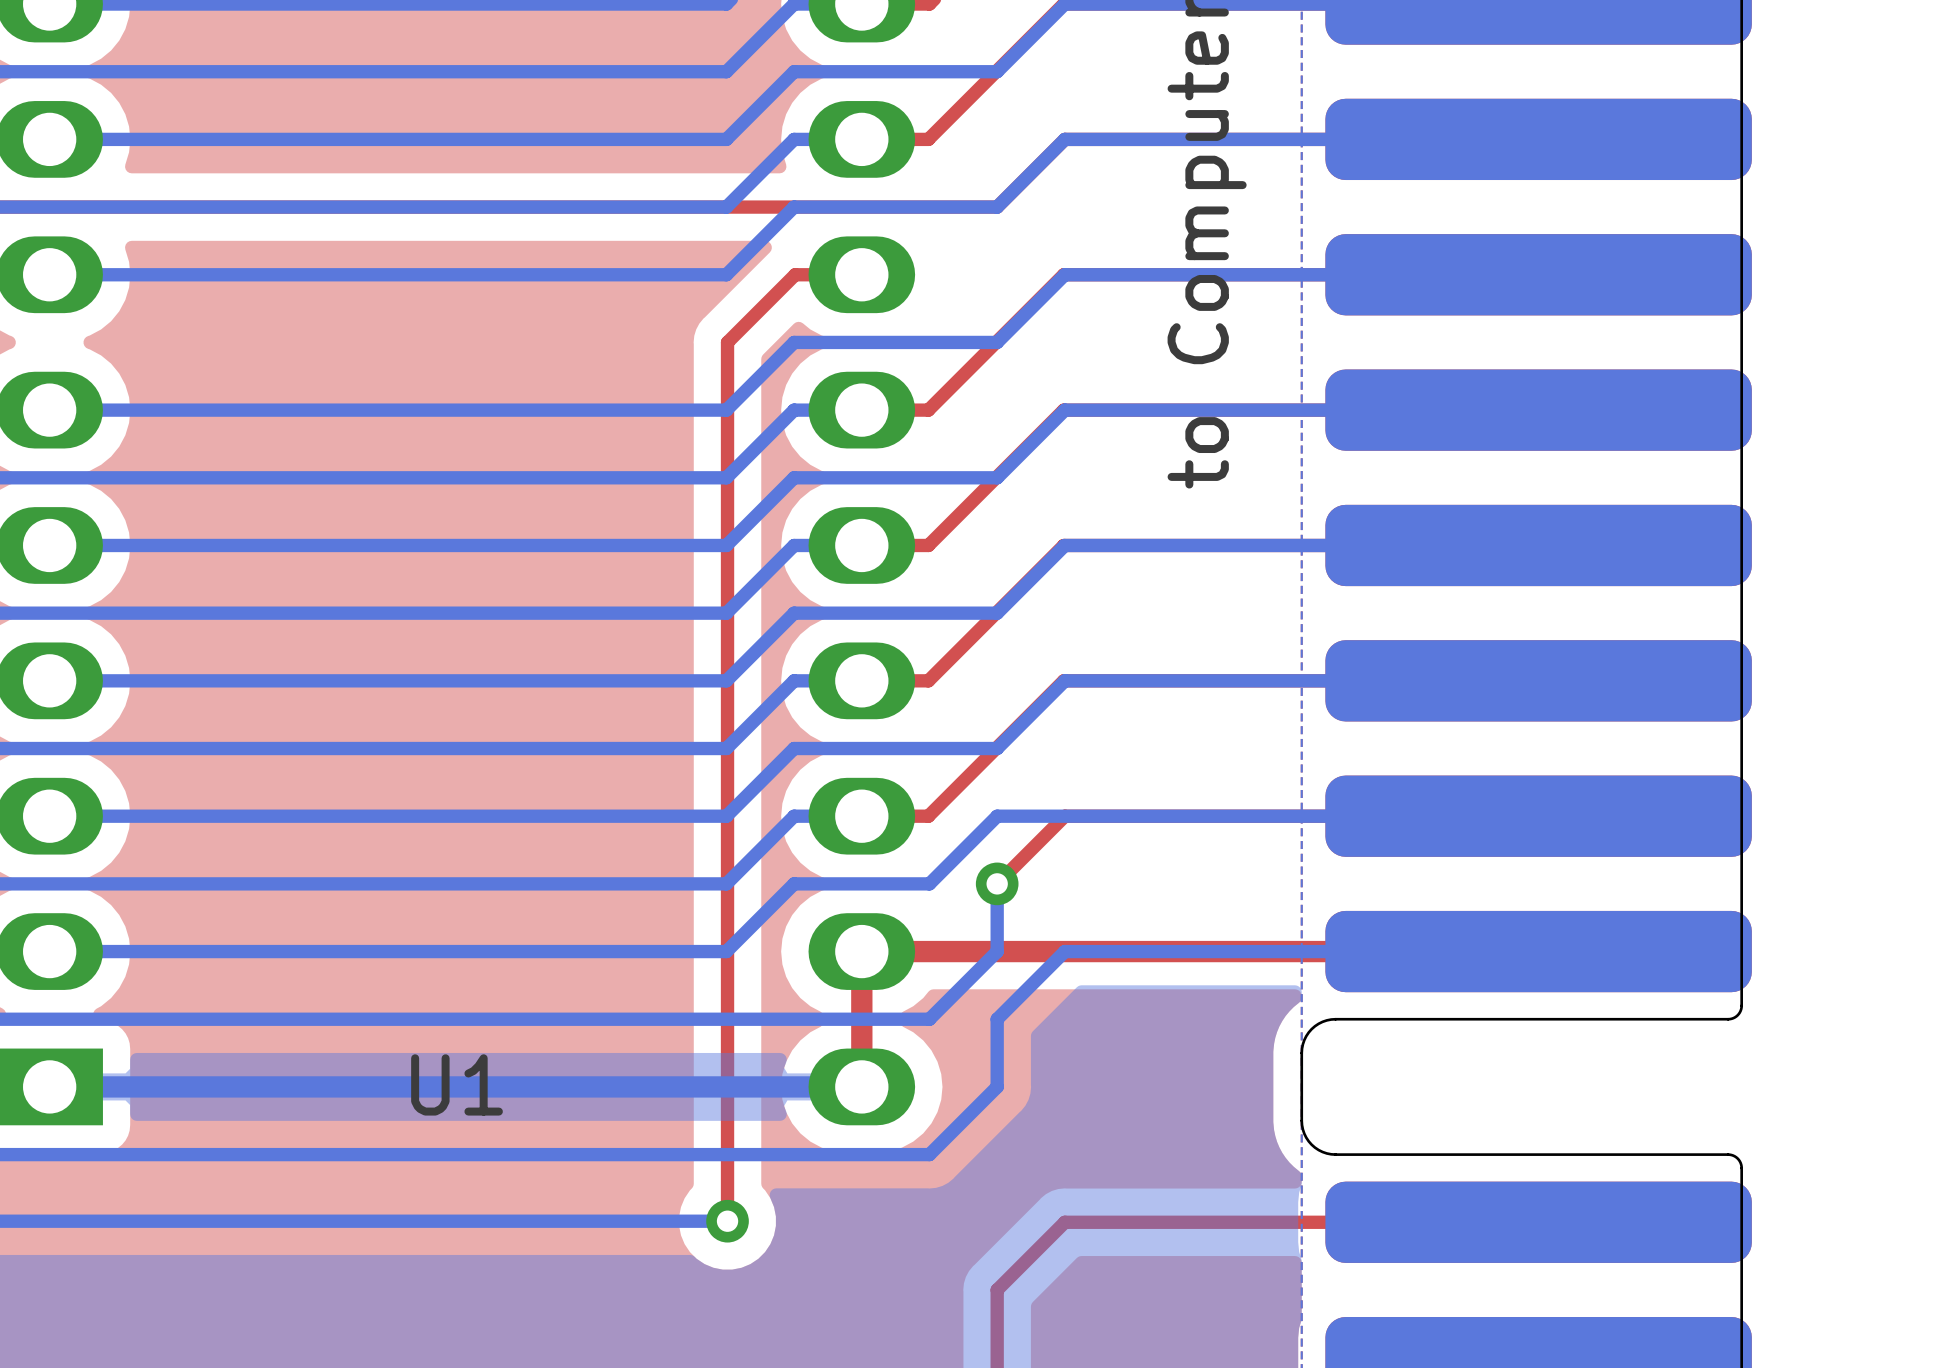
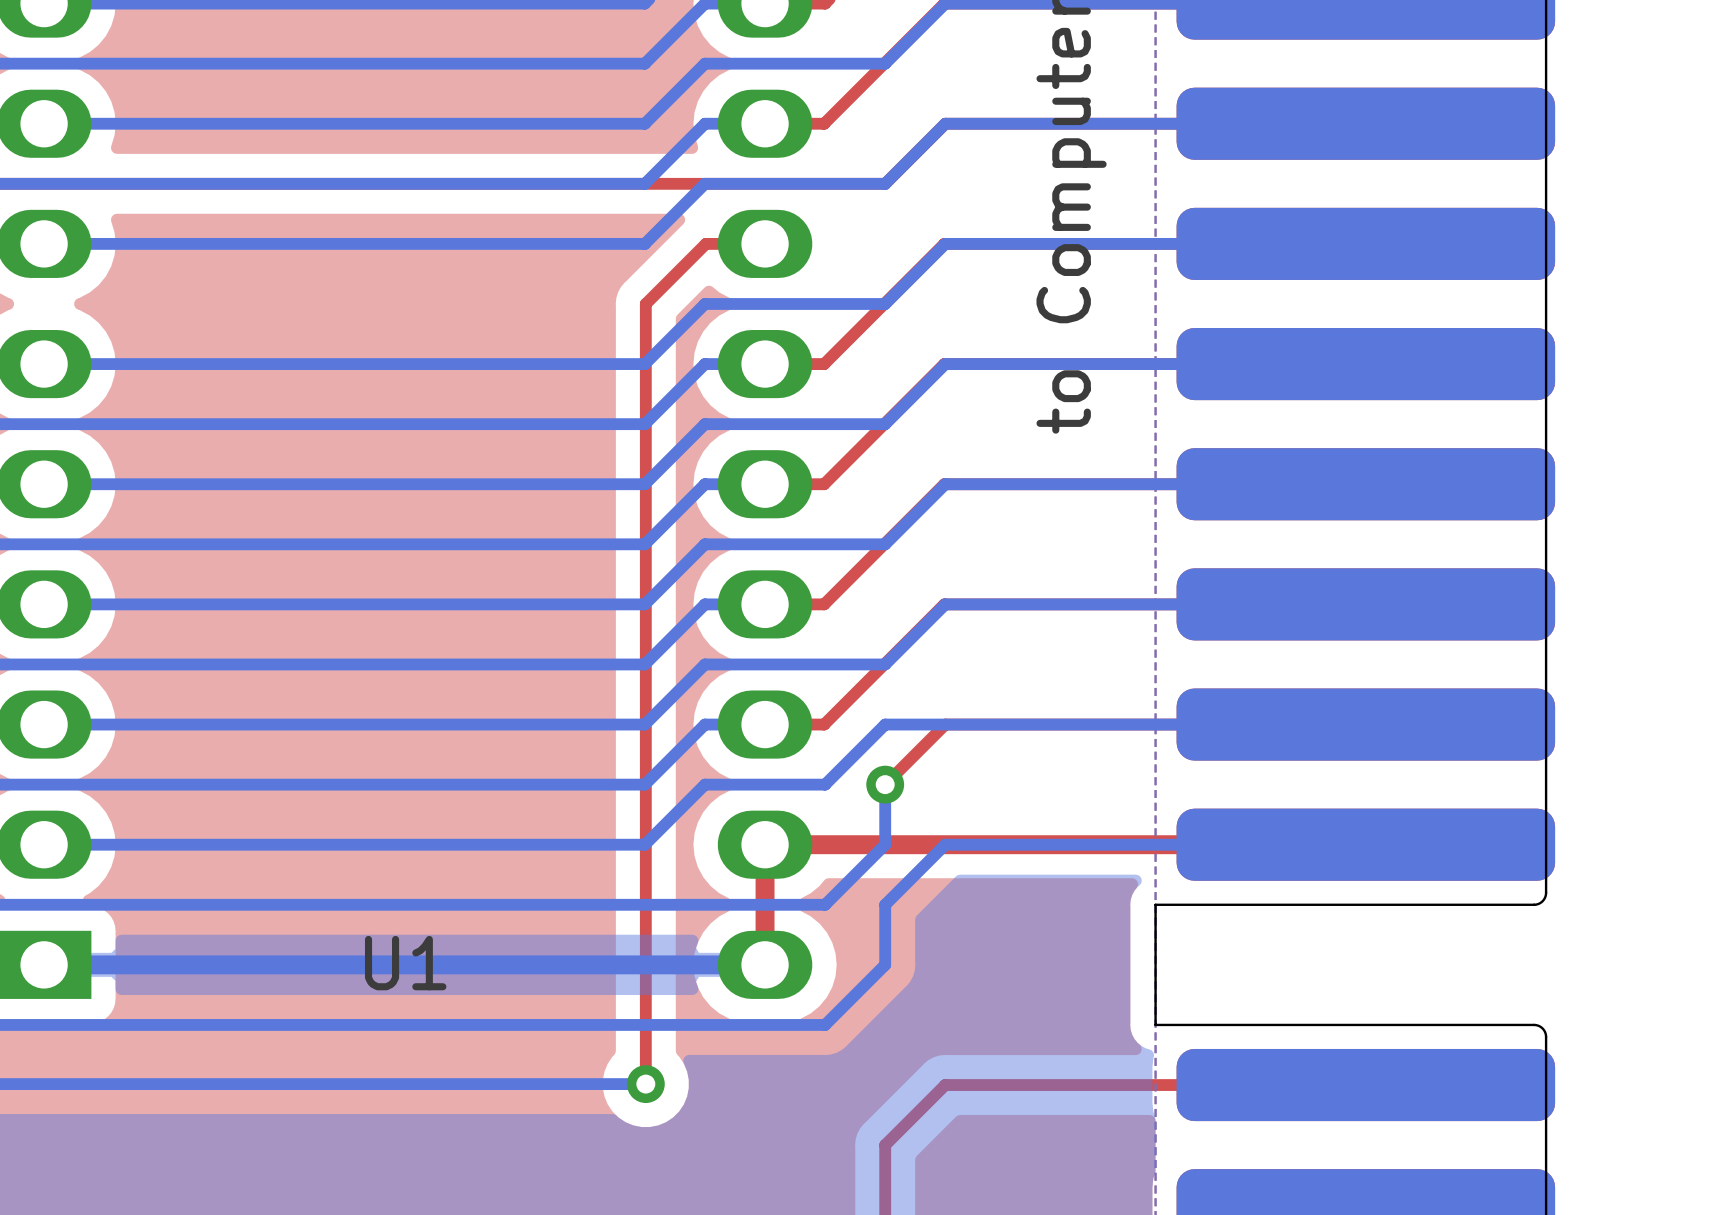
board edge: (1335, 1019) (1322, 1021) (1311, 1029) (1304, 1040) (1301, 1053) -> (1185, 904) (1155, 904) (1155, 934)
board edge: (1301, 1120) (1304, 1133) (1311, 1144) (1322, 1152) (1335, 1154) -> (1155, 994) (1155, 1024) (1185, 1024)

